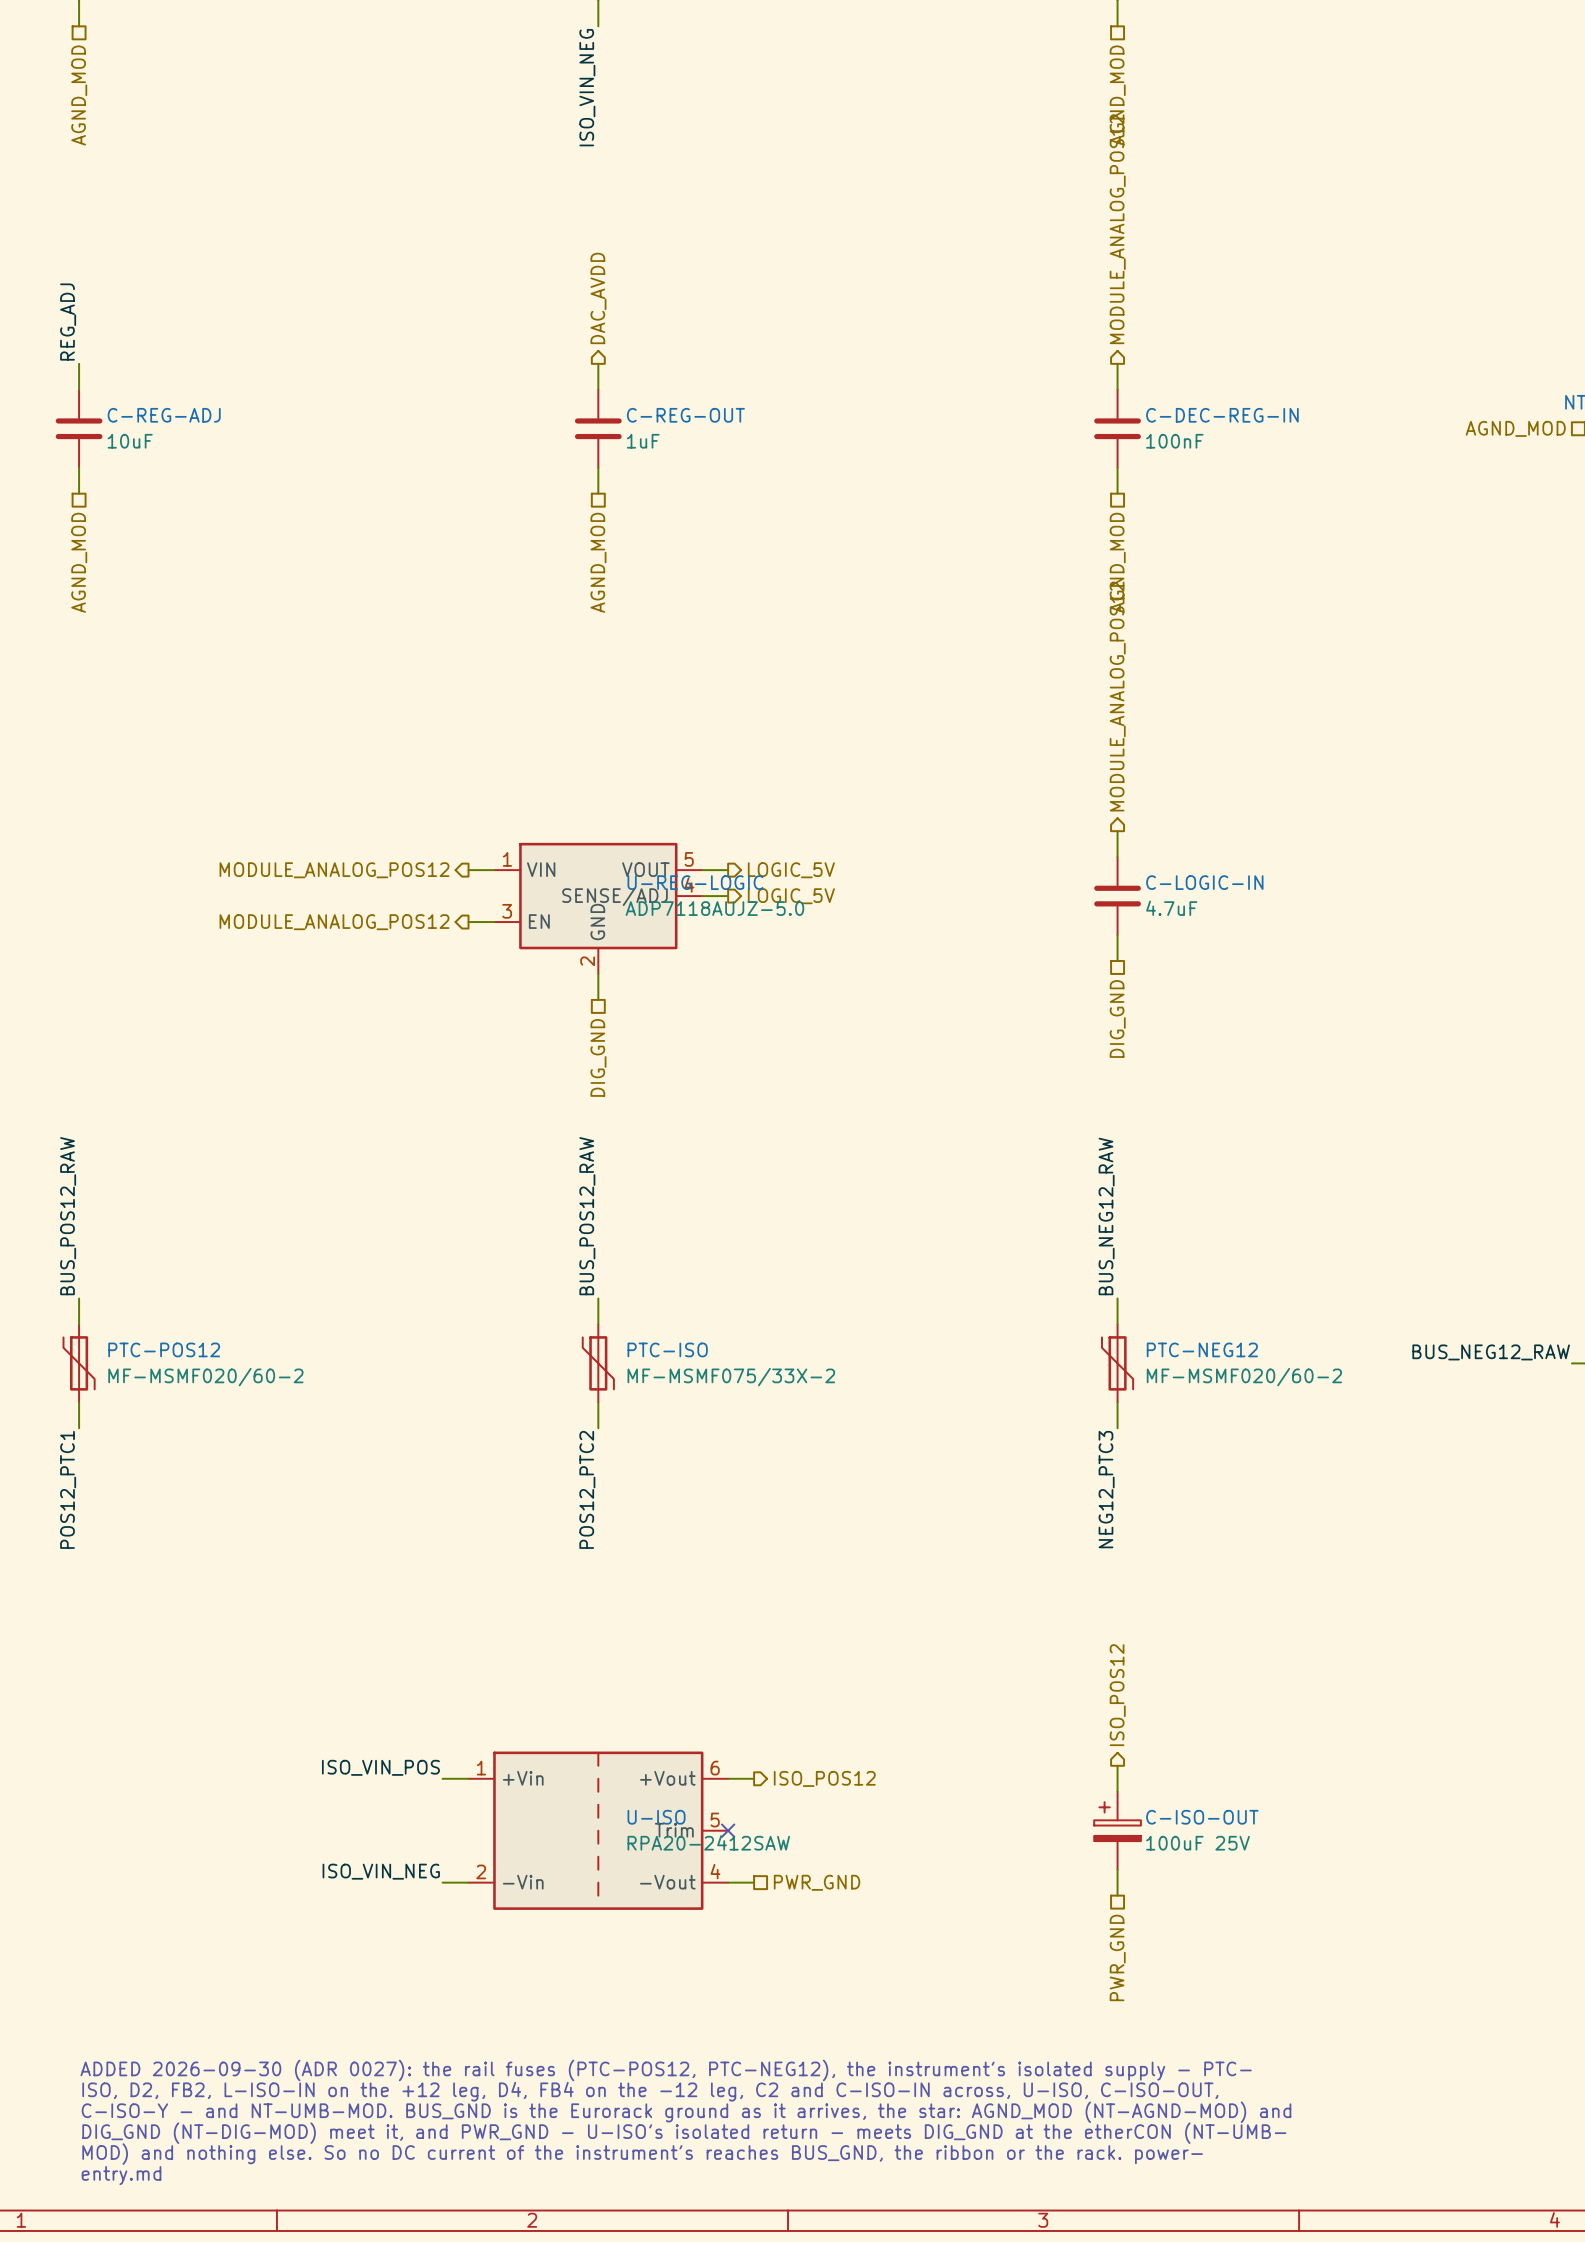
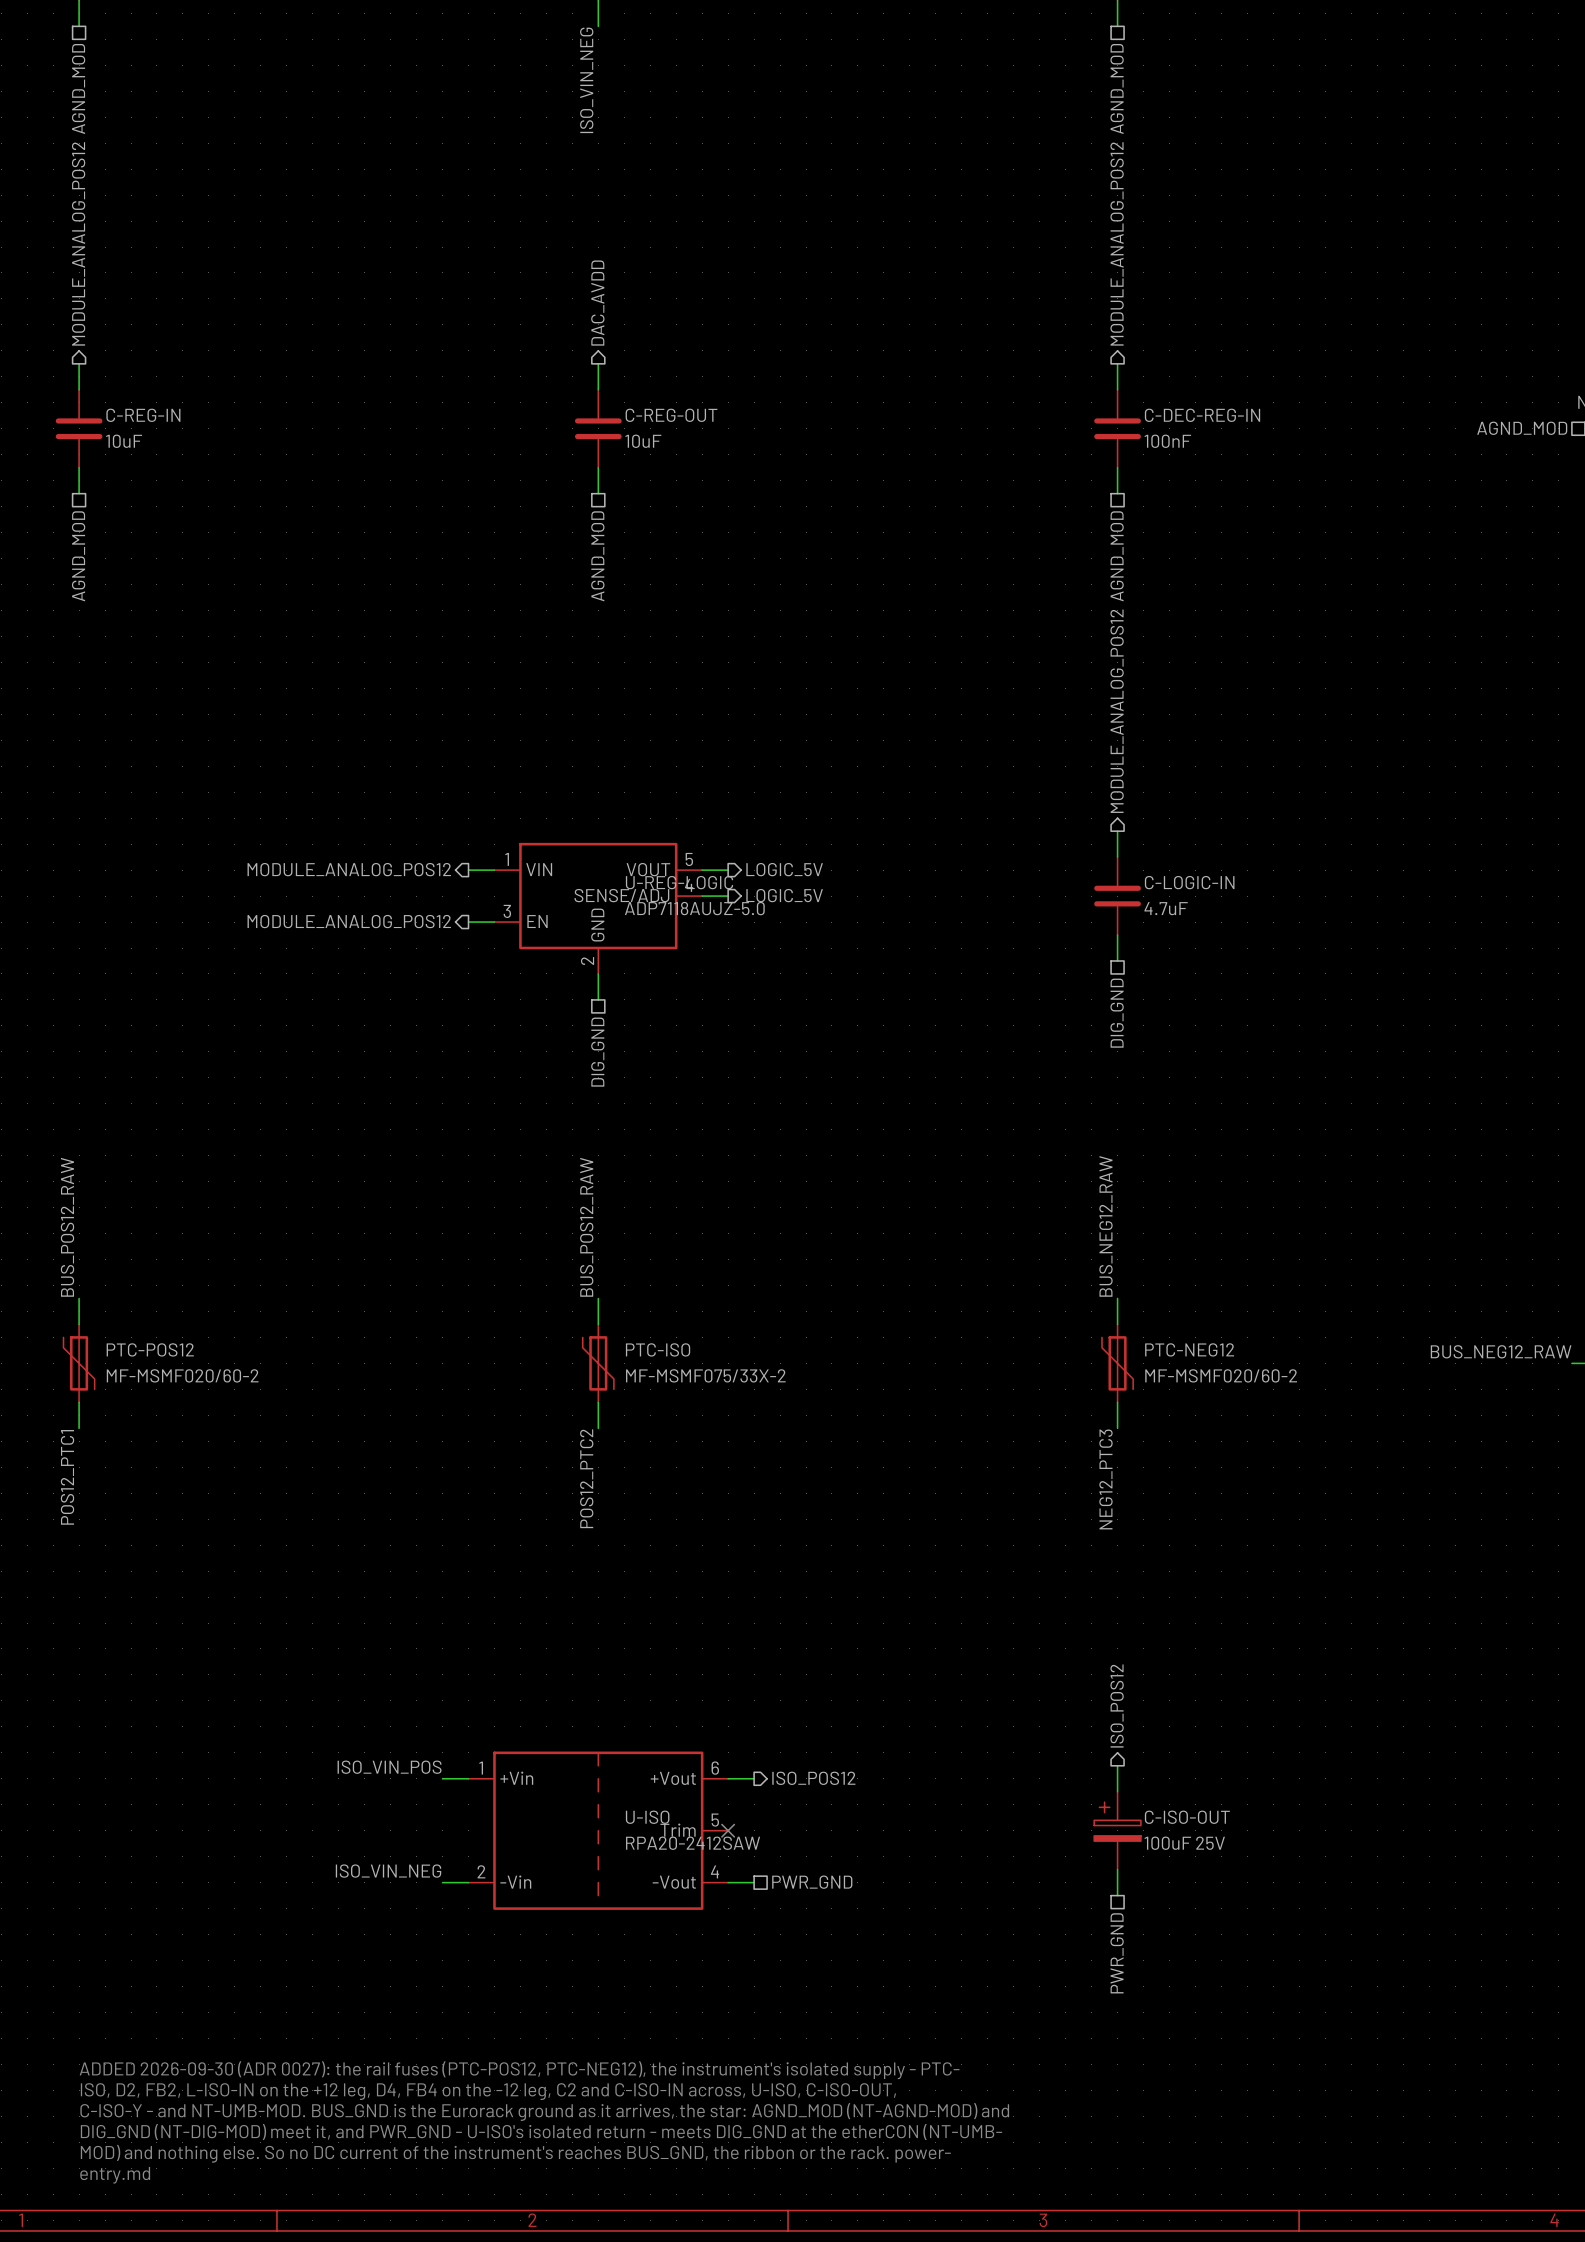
hierarchical label: none -> MODULE_ANALOG_POS12 (78, 243)
label: REG_ADJ (68, 322) -> none
C-REG-ADJ name: C-REG-ADJ (164, 415) -> C-REG-IN (143, 415)
C-REG-OUT value: 1uF (643, 441) -> 10uF (643, 441)

